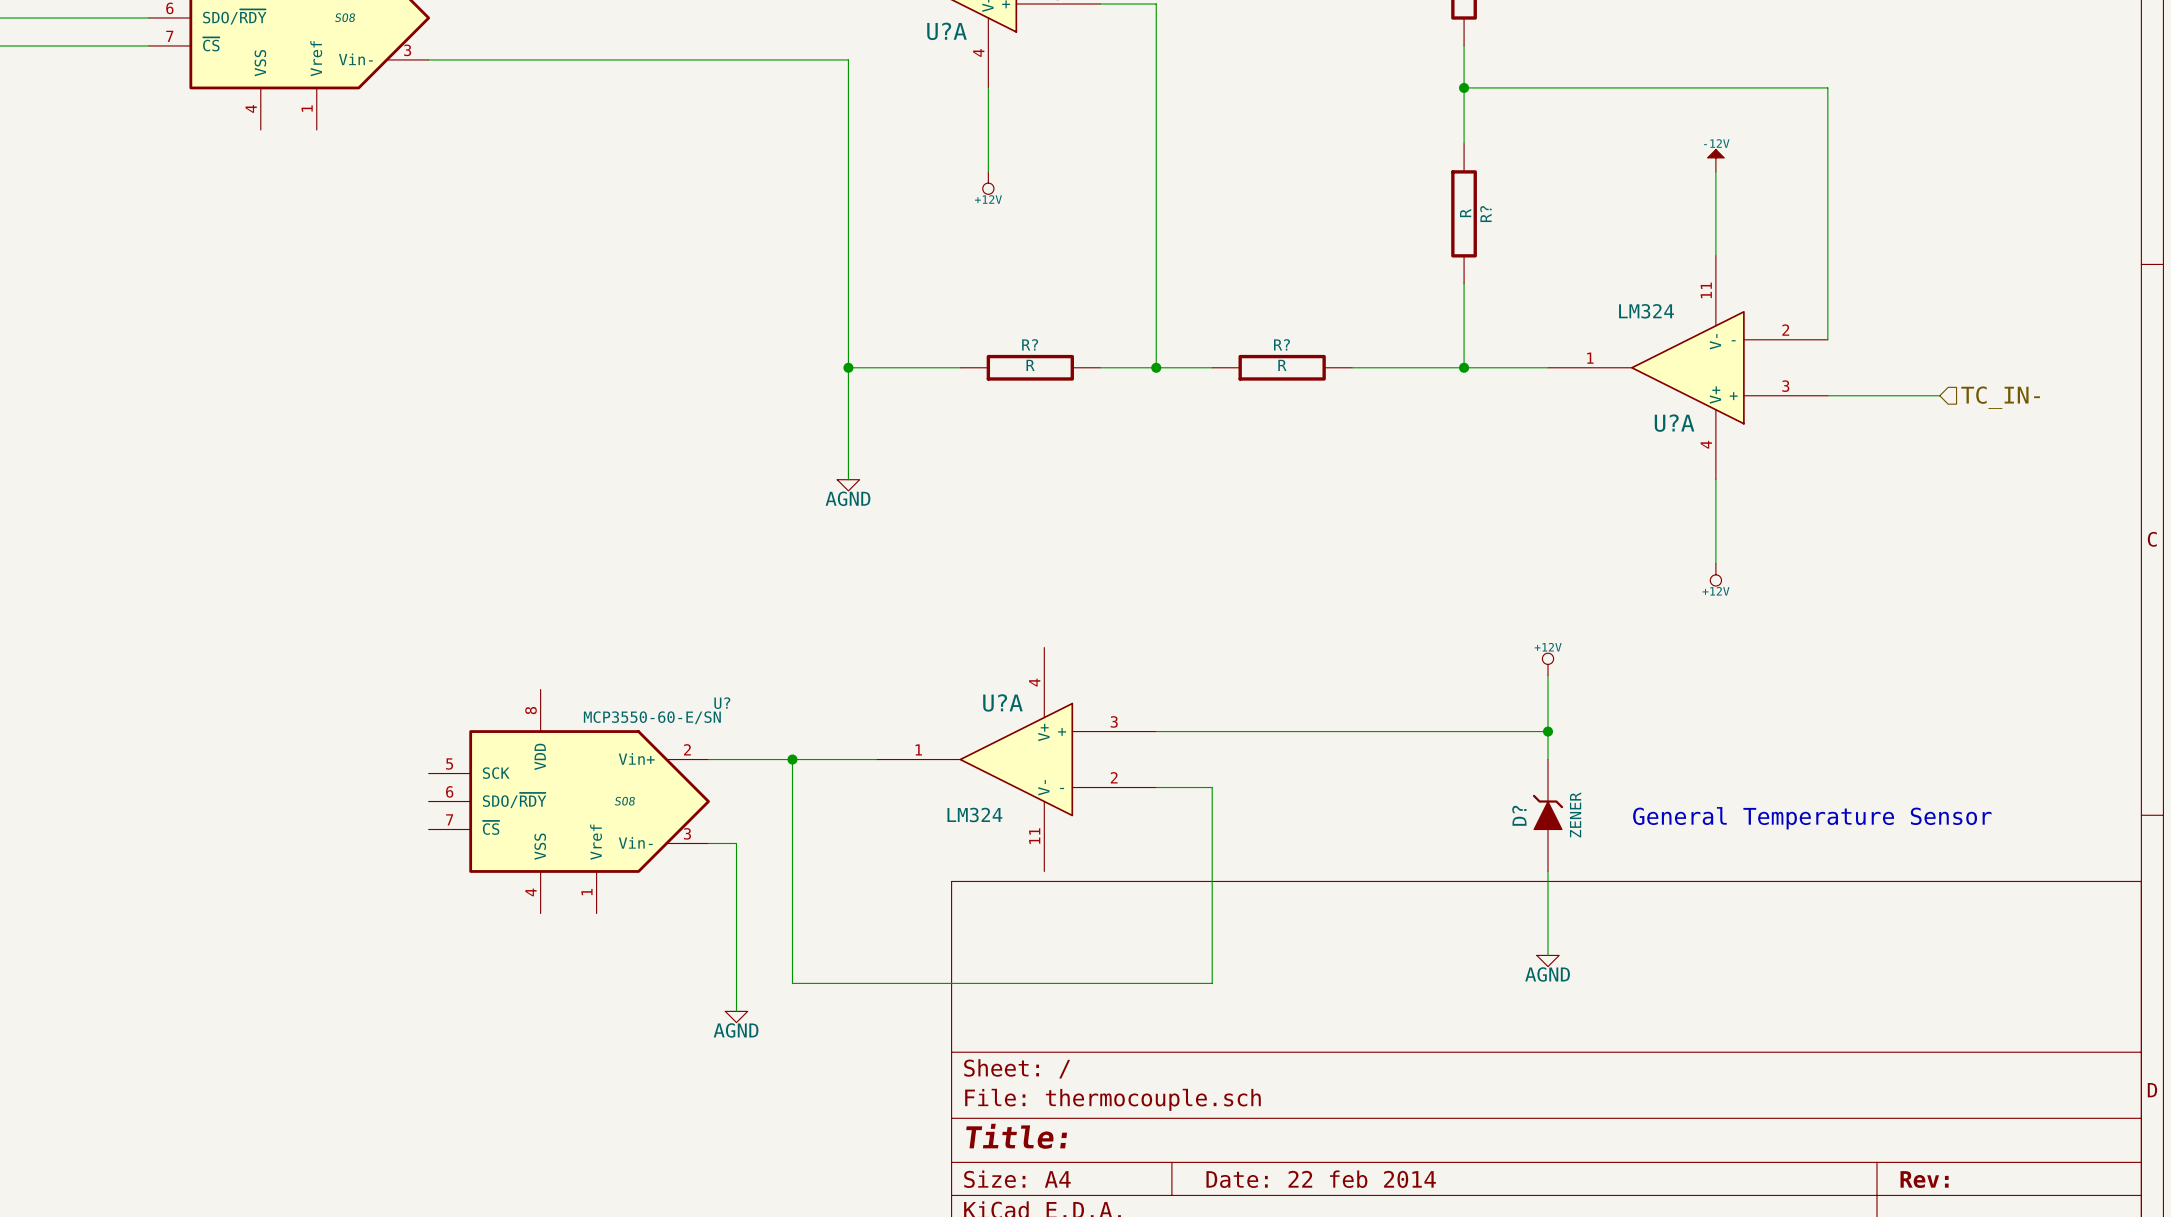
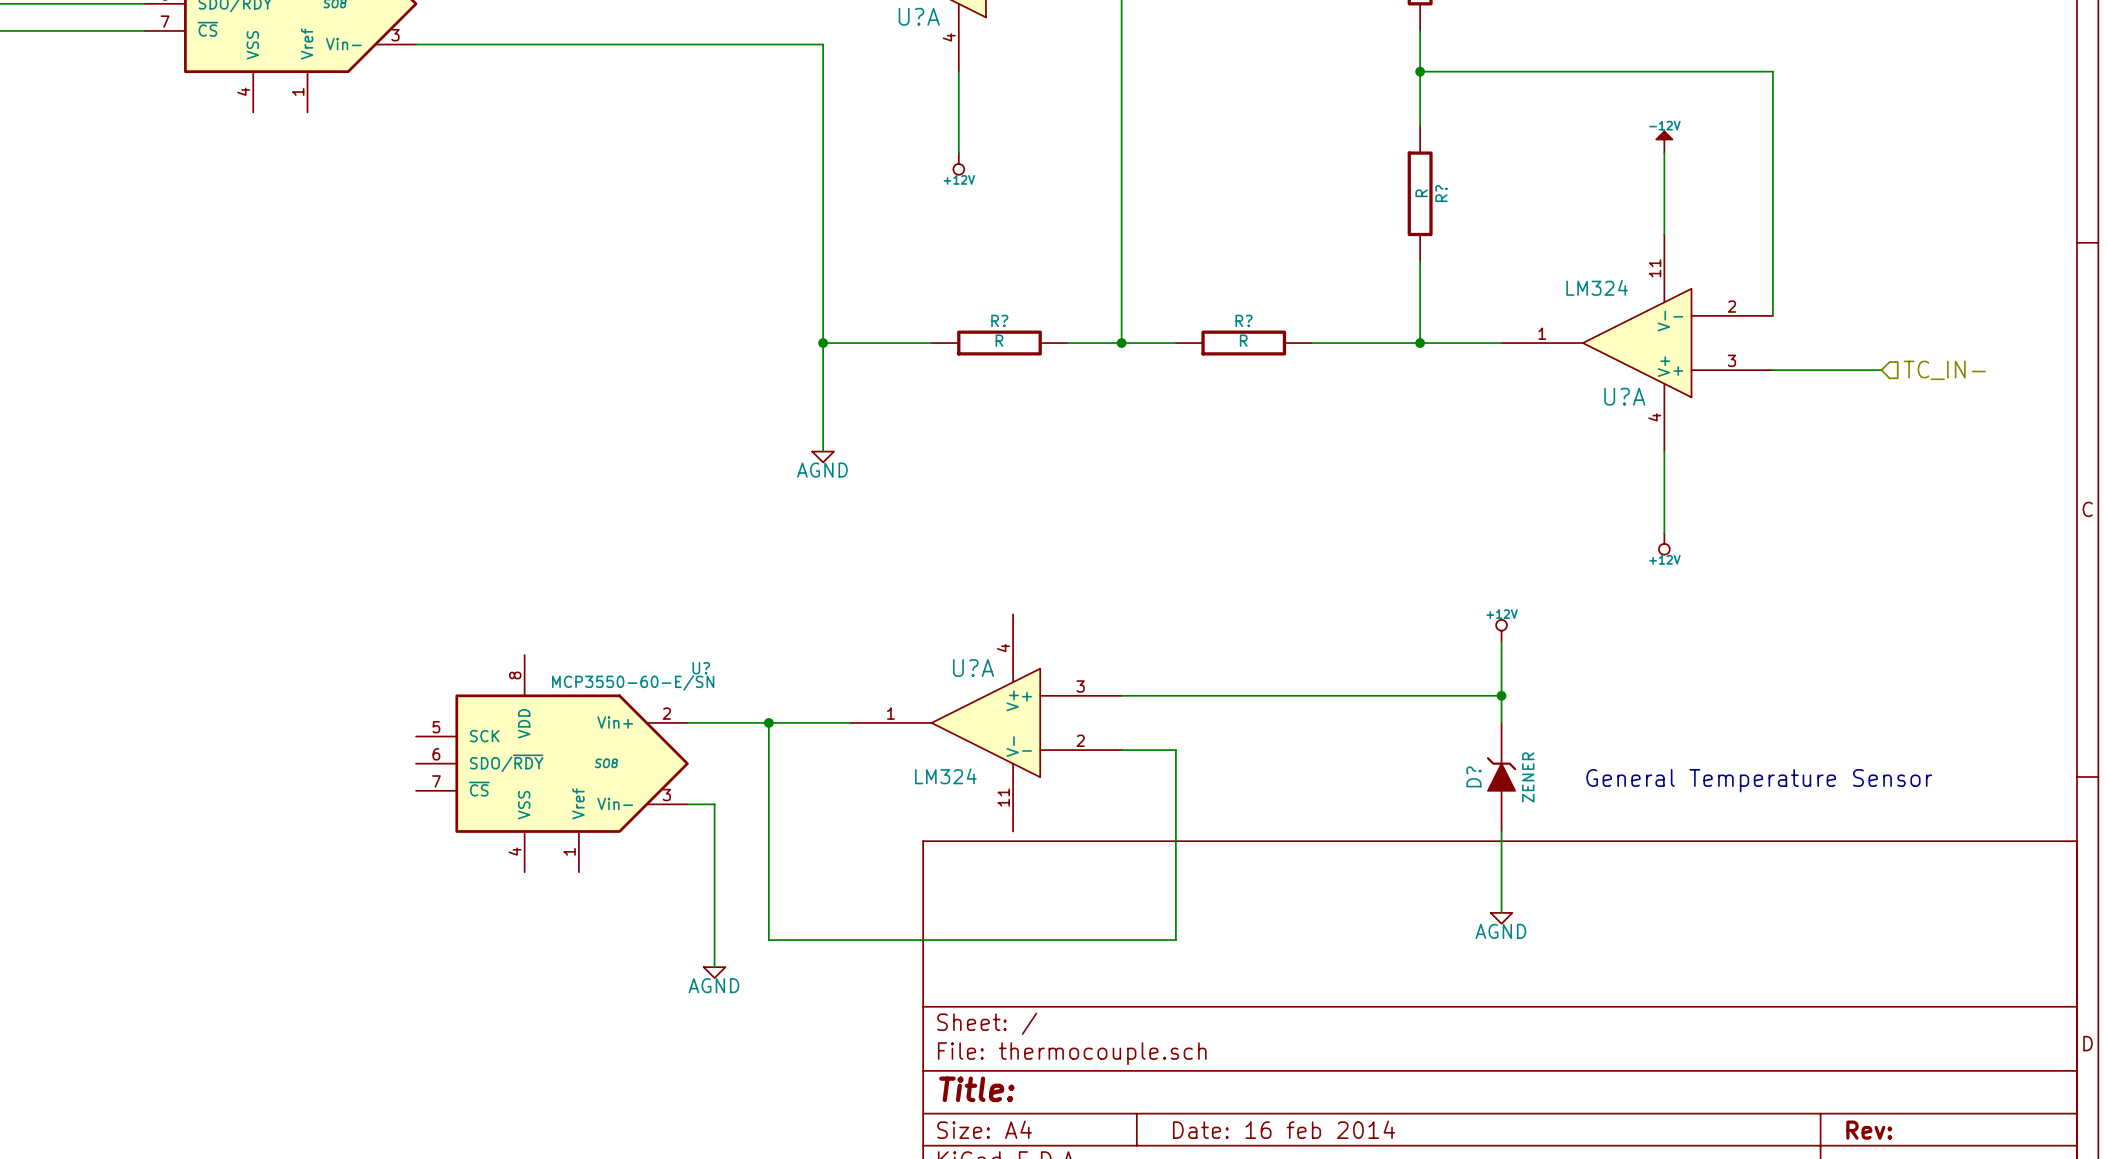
title block: Date: 22 feb 2014 (1321, 1179) -> Date: 16 feb 2014 (1284, 1129)

